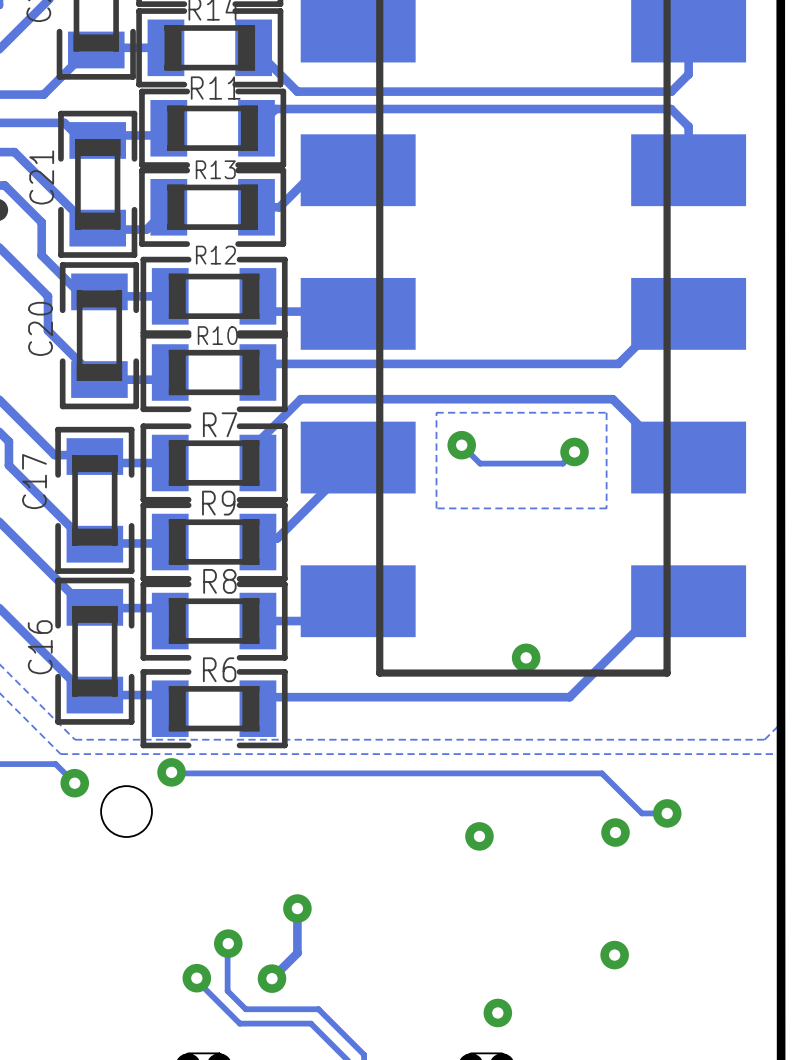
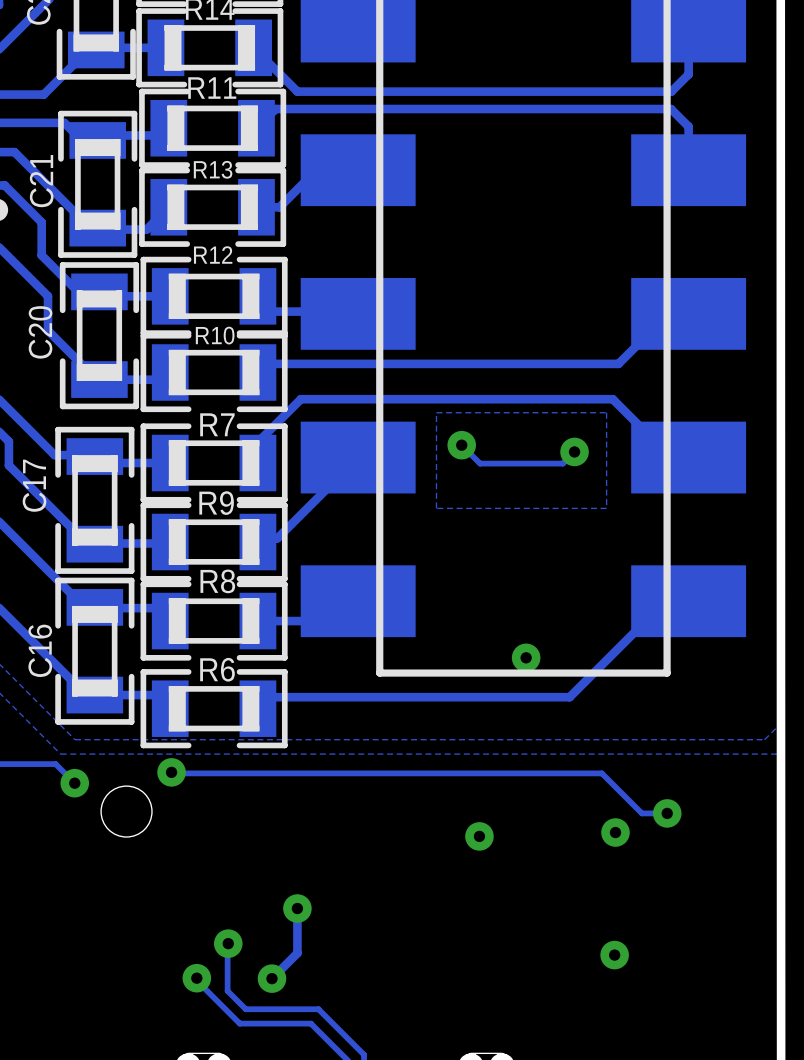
via: (497, 1012) -> none

